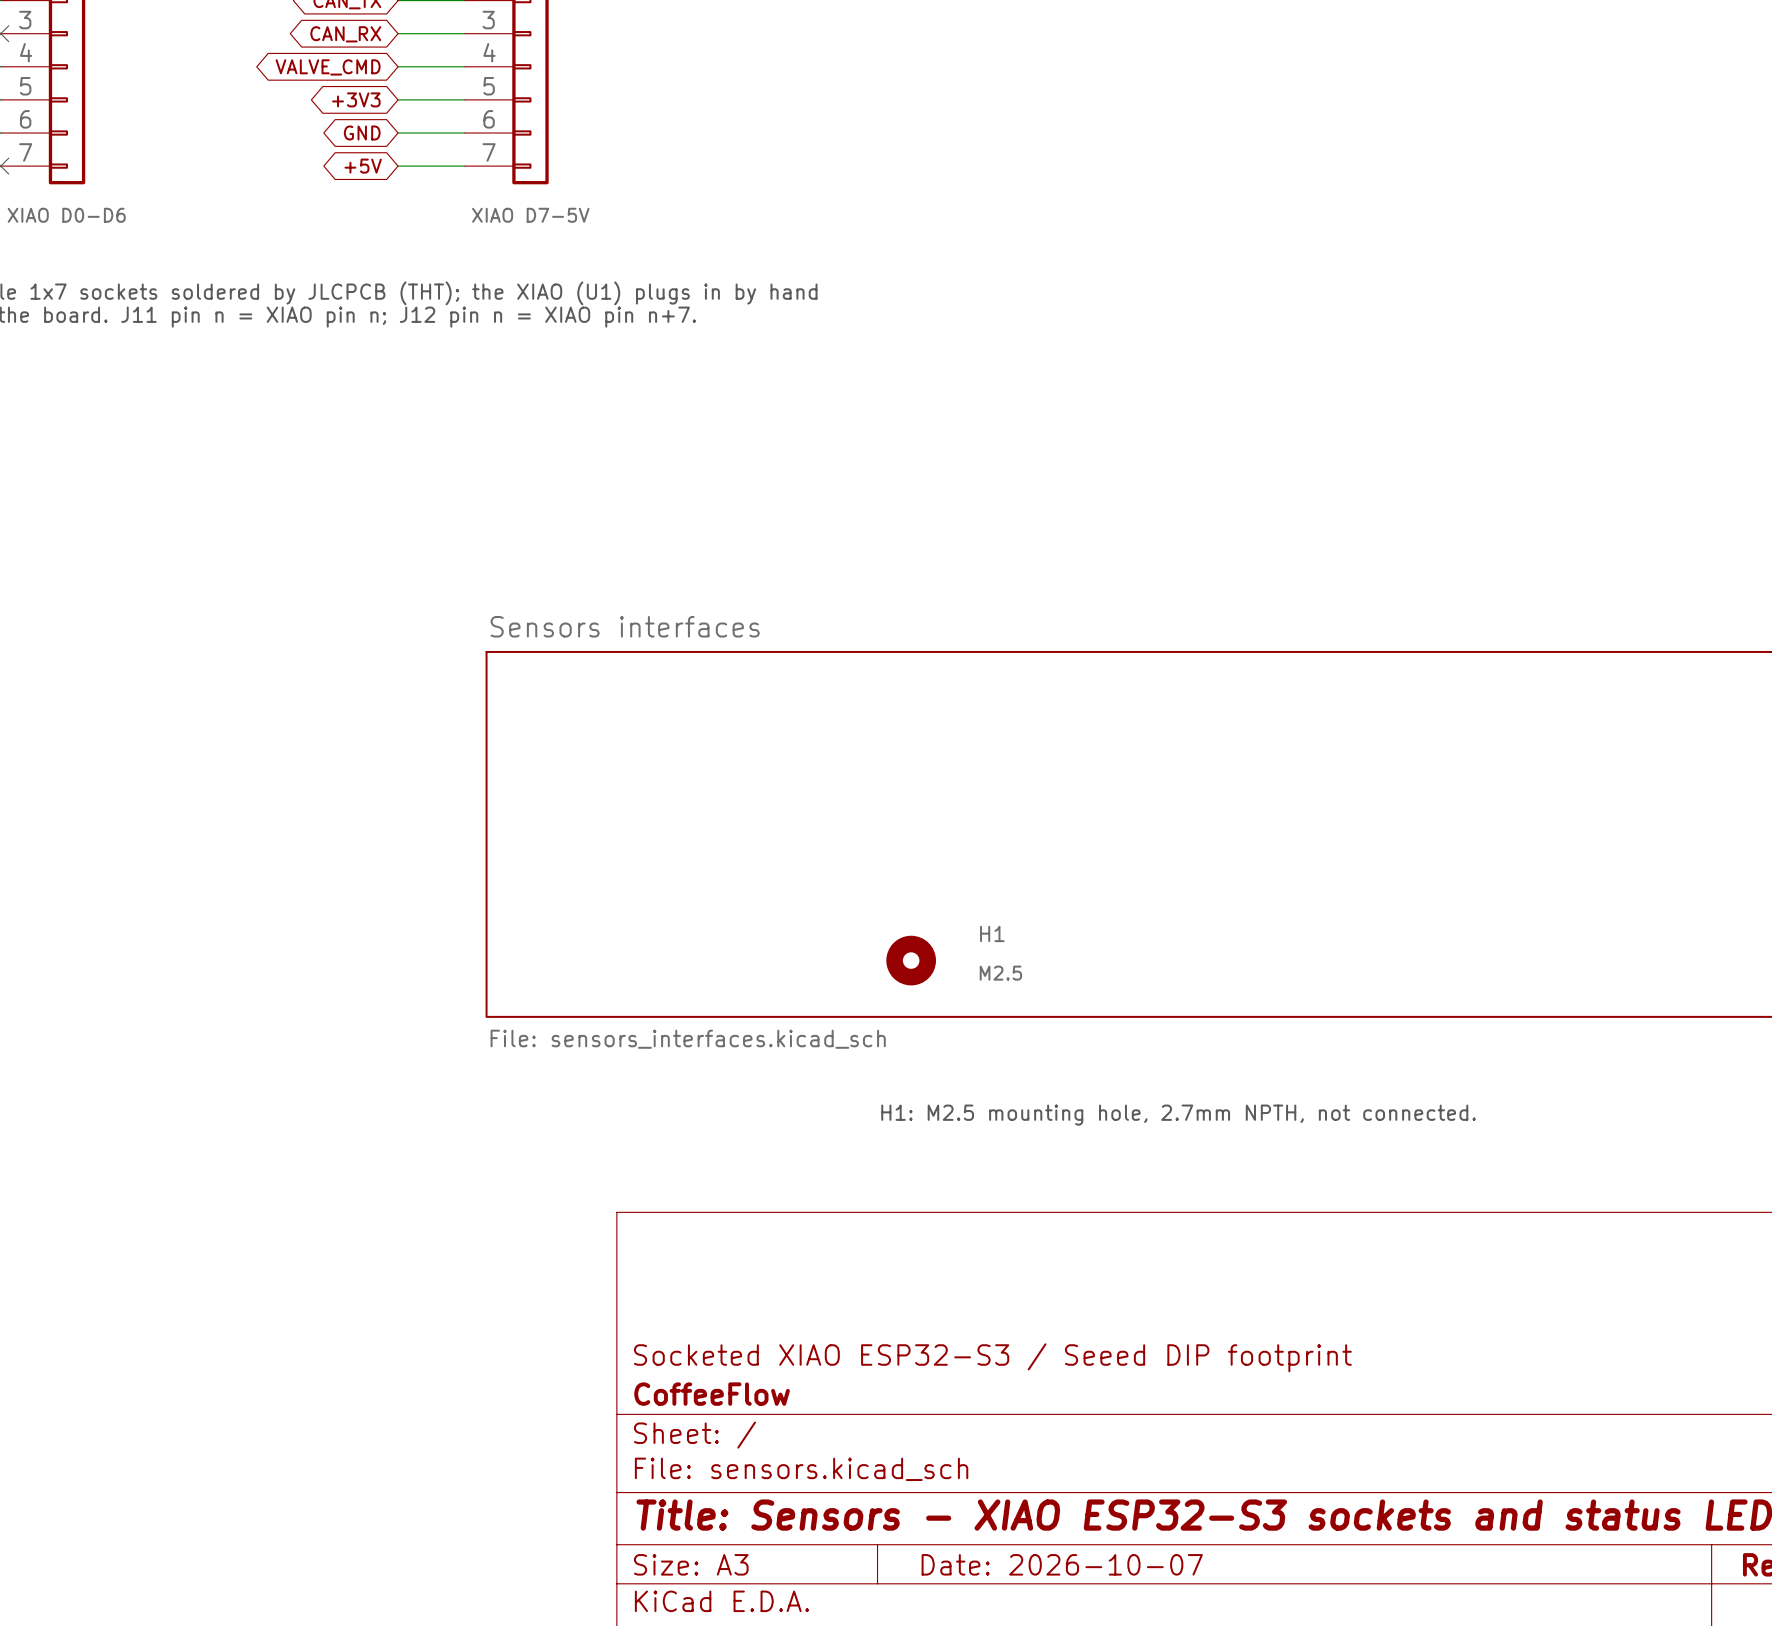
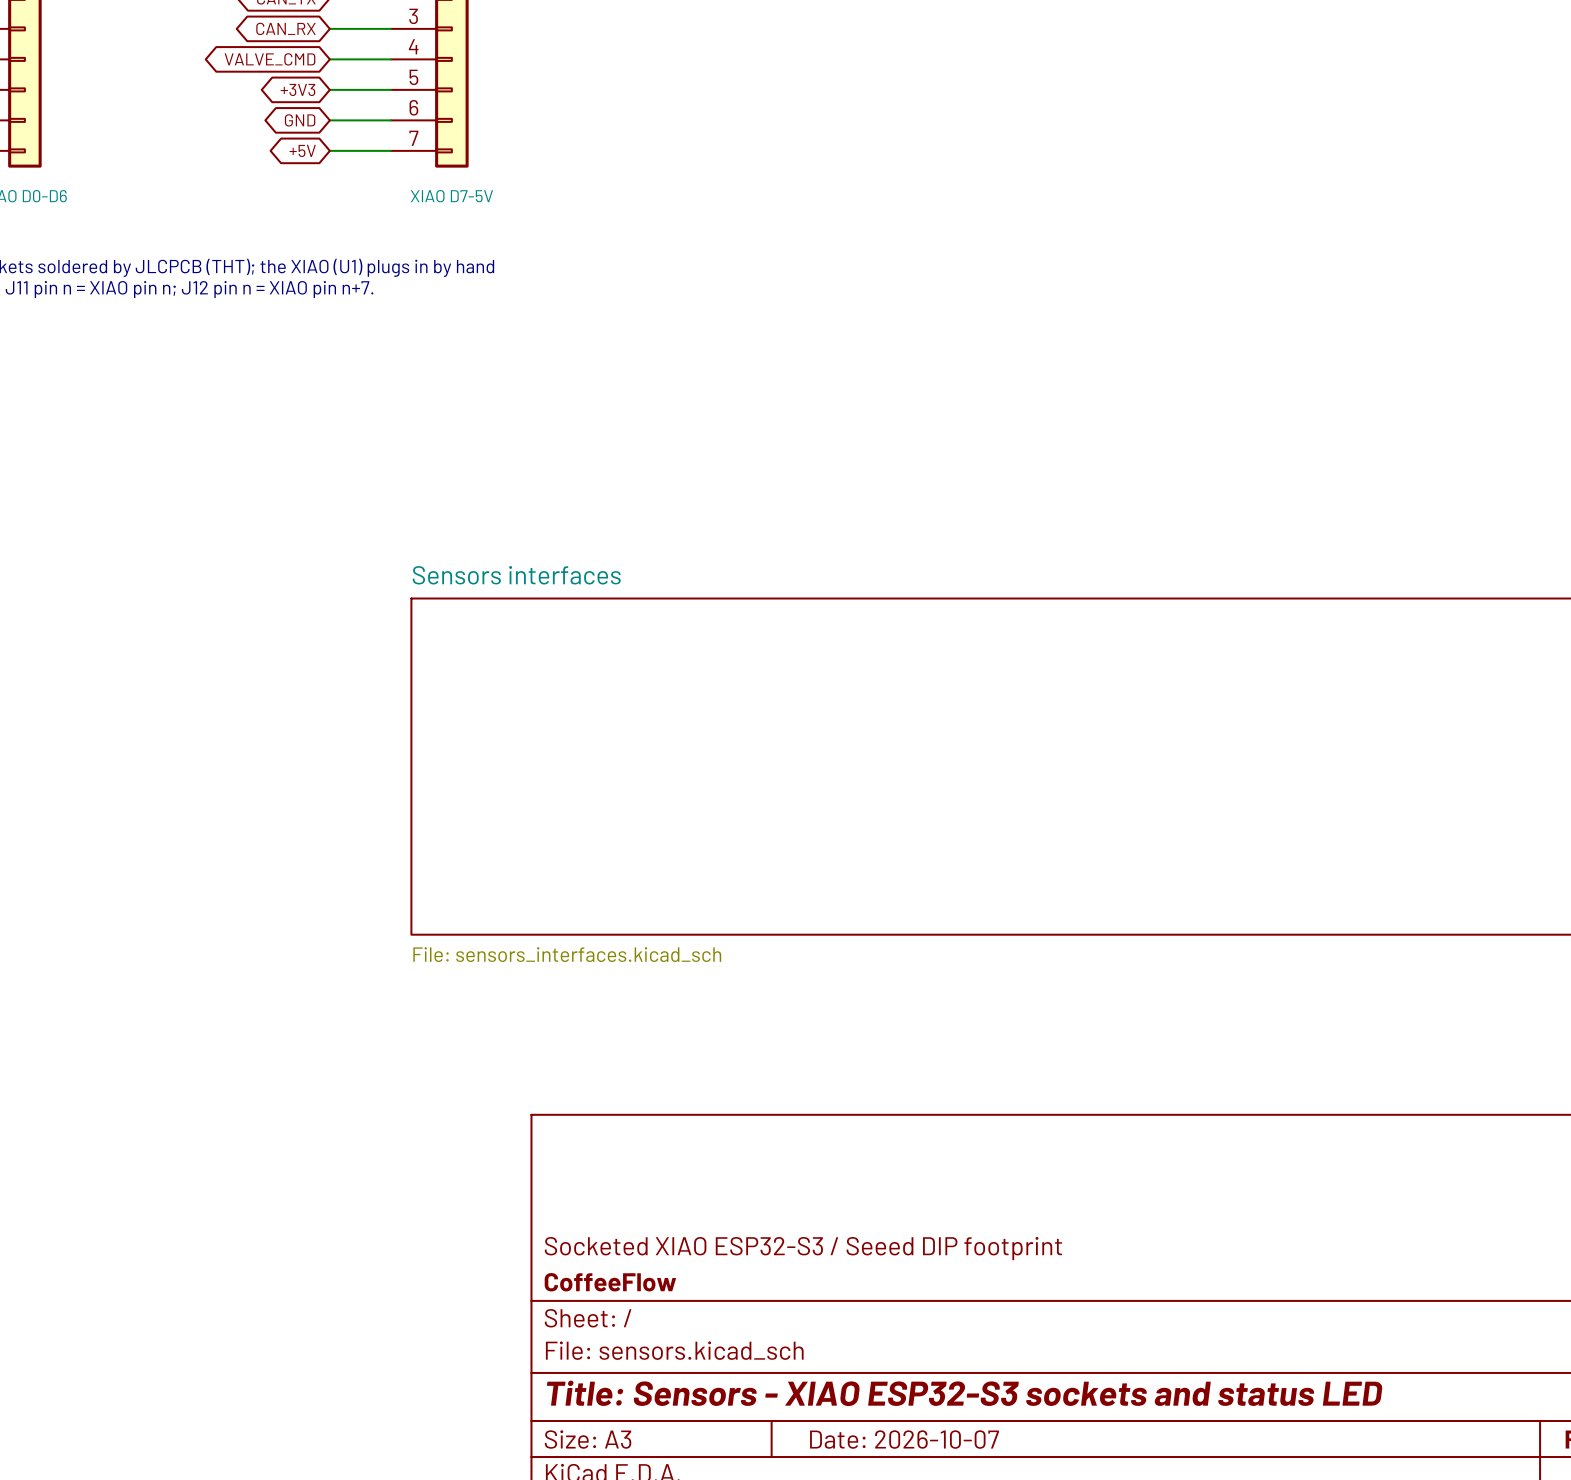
H1: M2.5 (911, 960) -> none
text: H1: M2.5 mounting hole, 2.7mm NPTH, not connected. (1178, 1115) -> none

